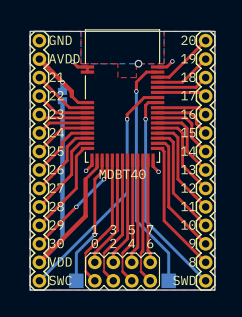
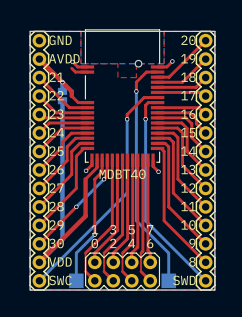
top track: (87, 66) (87, 72) -> (71, 68) (75, 72) (87, 72)

